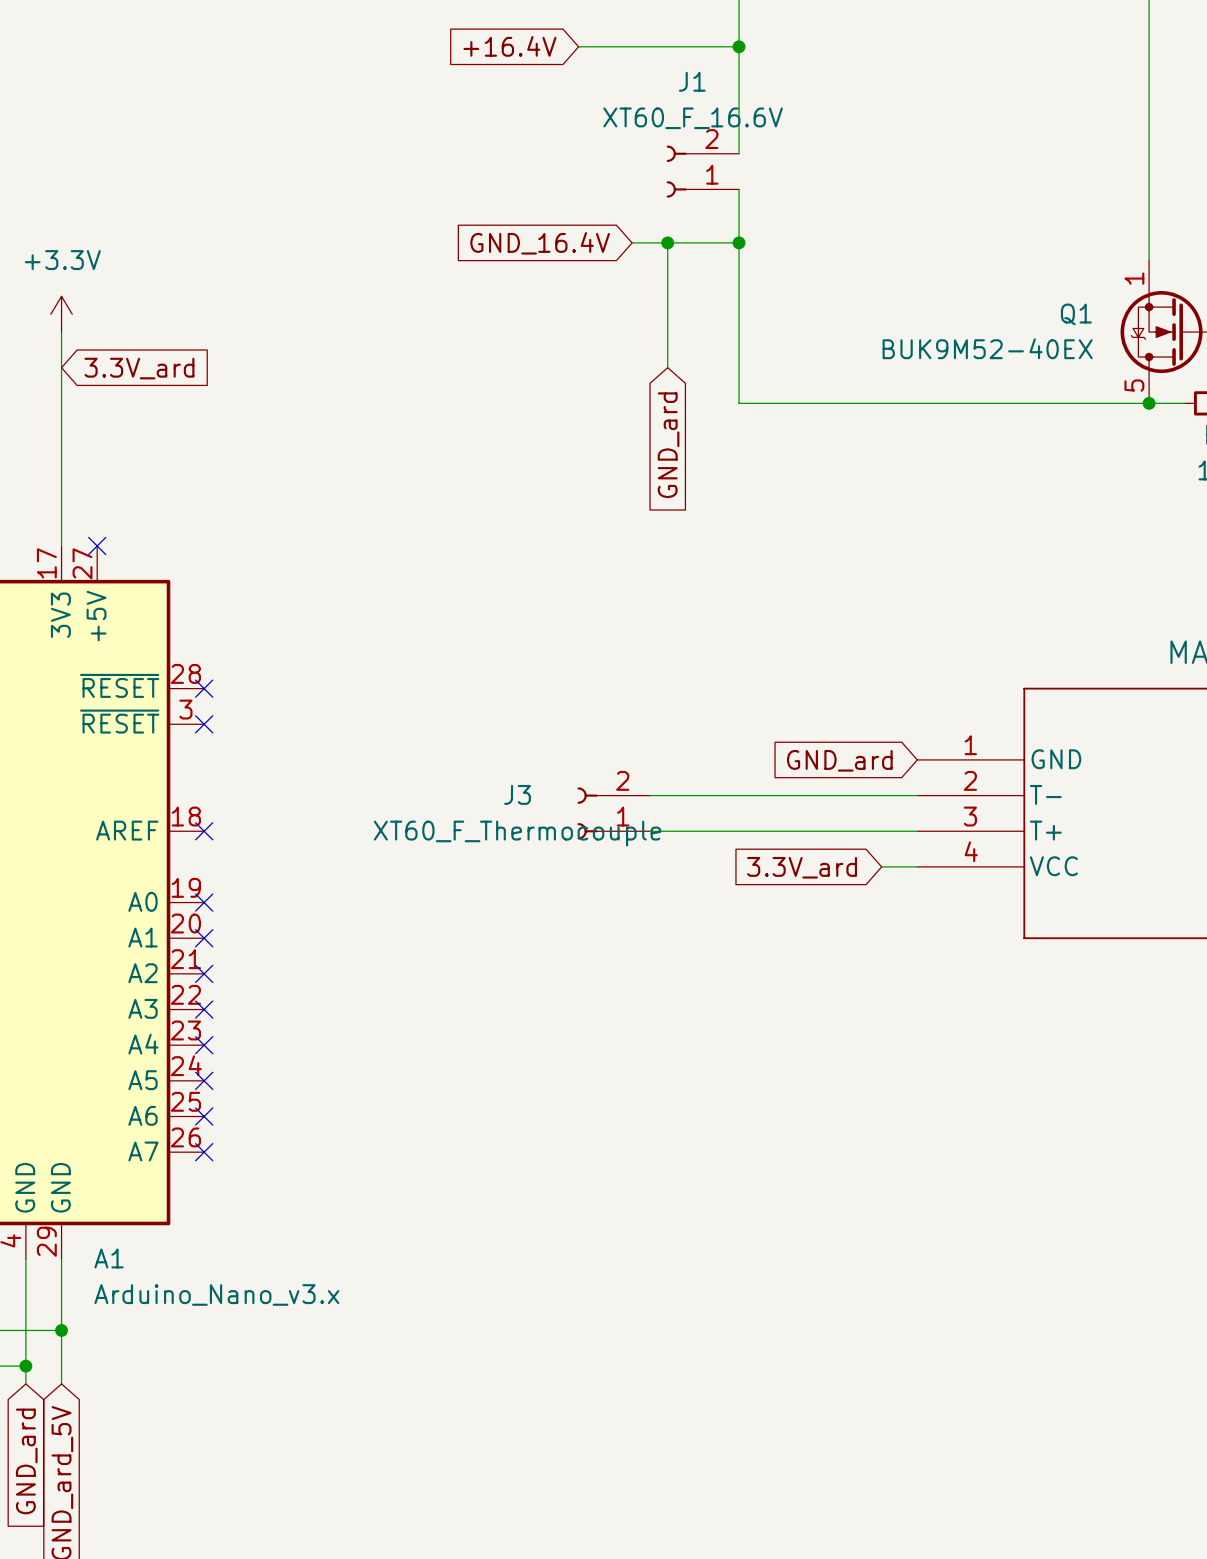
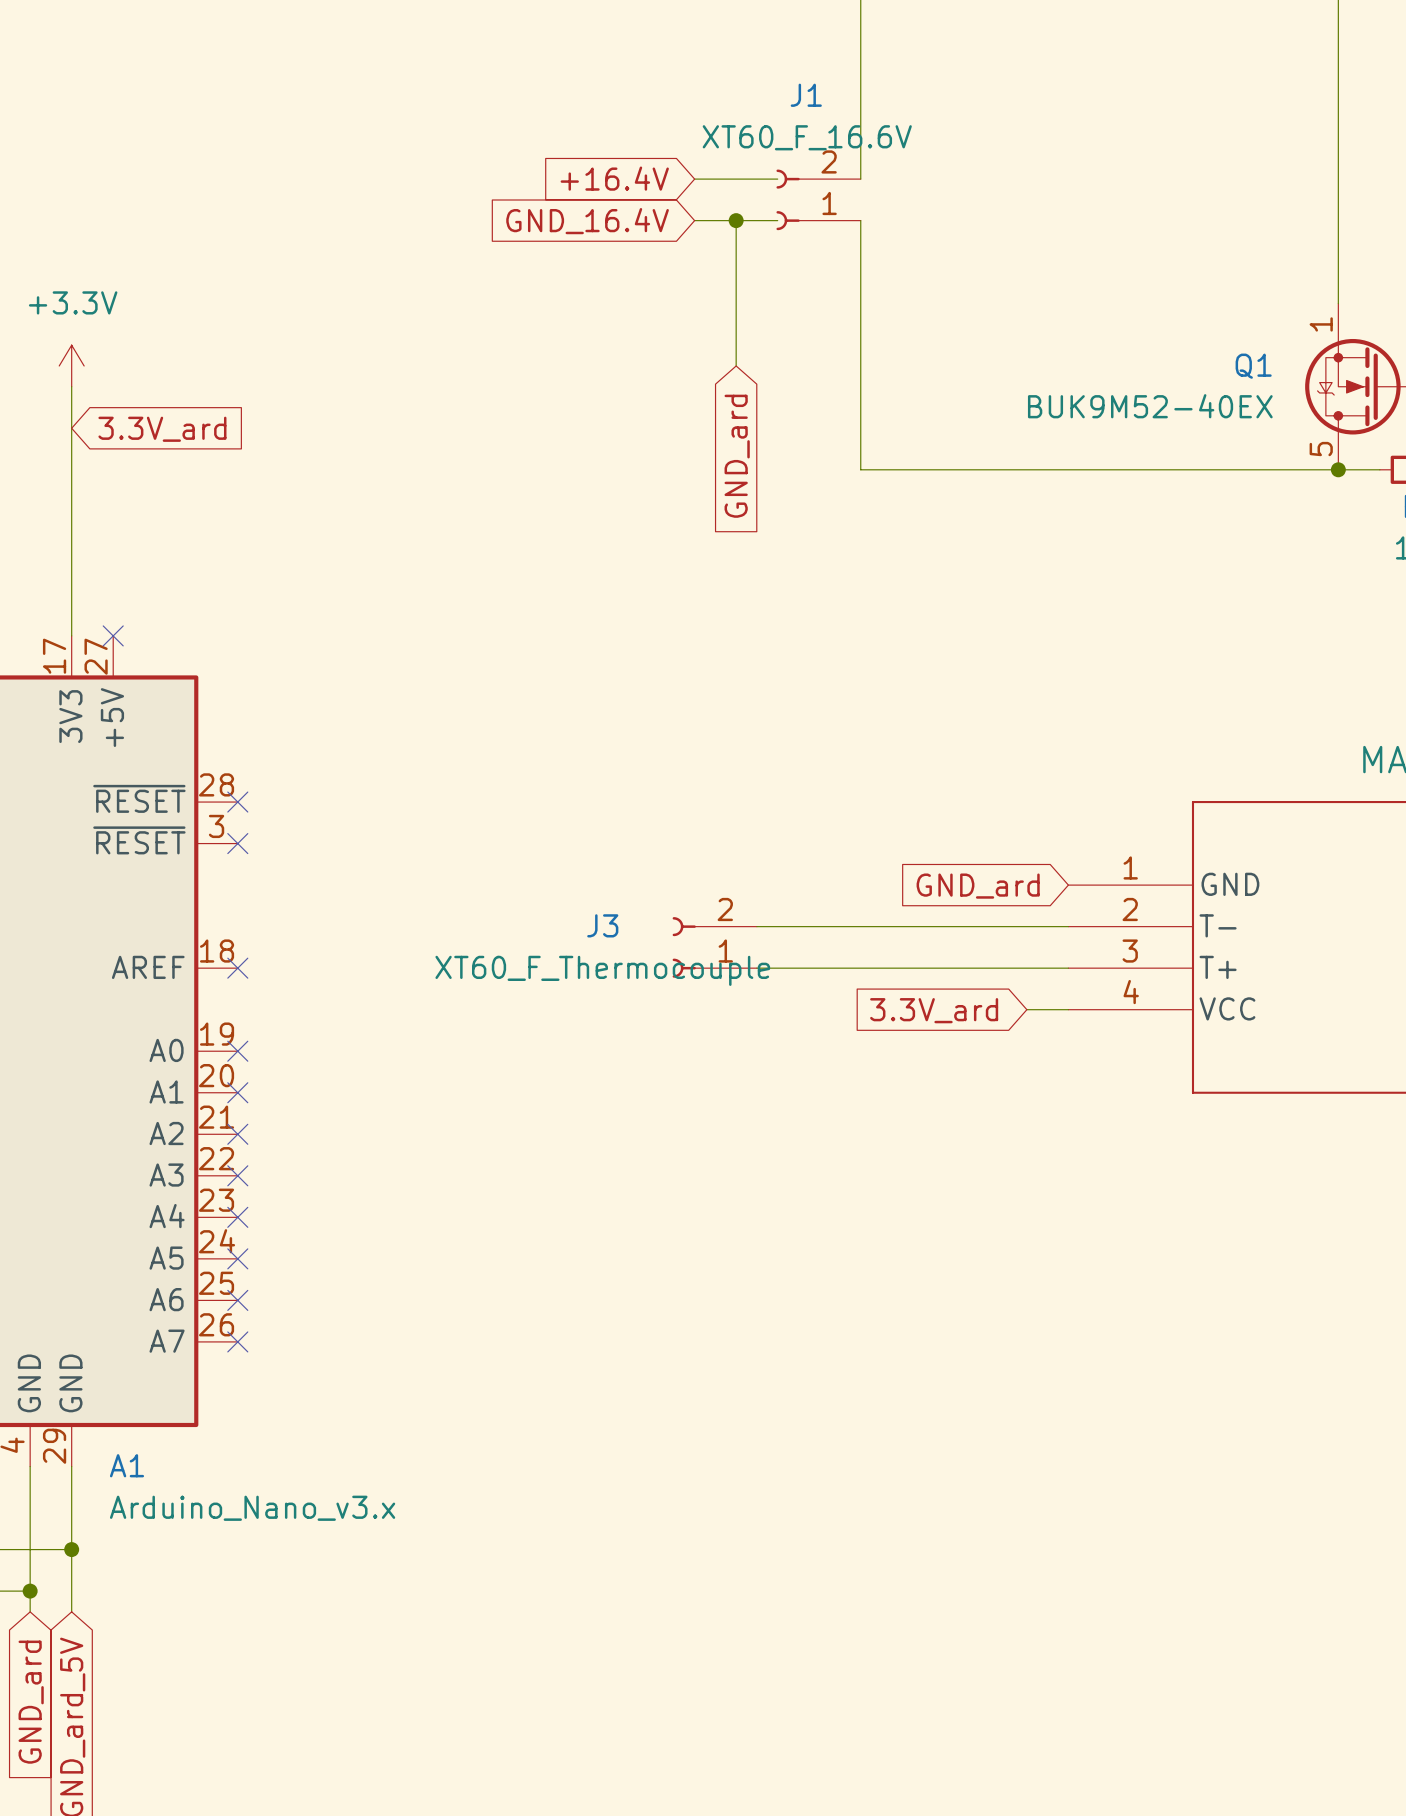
global label position: +16.4V (509, 46) -> +16.4V (614, 178)
wire: (578, 46) (739, 46) -> none
junction: (739, 46) -> none
wire: none -> (694, 179) (777, 179)
wire: none -> (694, 220) (777, 220)
junction: none -> (736, 220)
wire: (632, 242) (739, 242) -> none
wire: (667, 242) (667, 367) -> (736, 220) (736, 365)
junction: (667, 242) -> none
junction: (739, 242) -> none
global label position: GND_16.4V (540, 243) -> GND_16.4V (587, 221)
global label position: GND_ard (668, 445) -> GND_ard (737, 456)

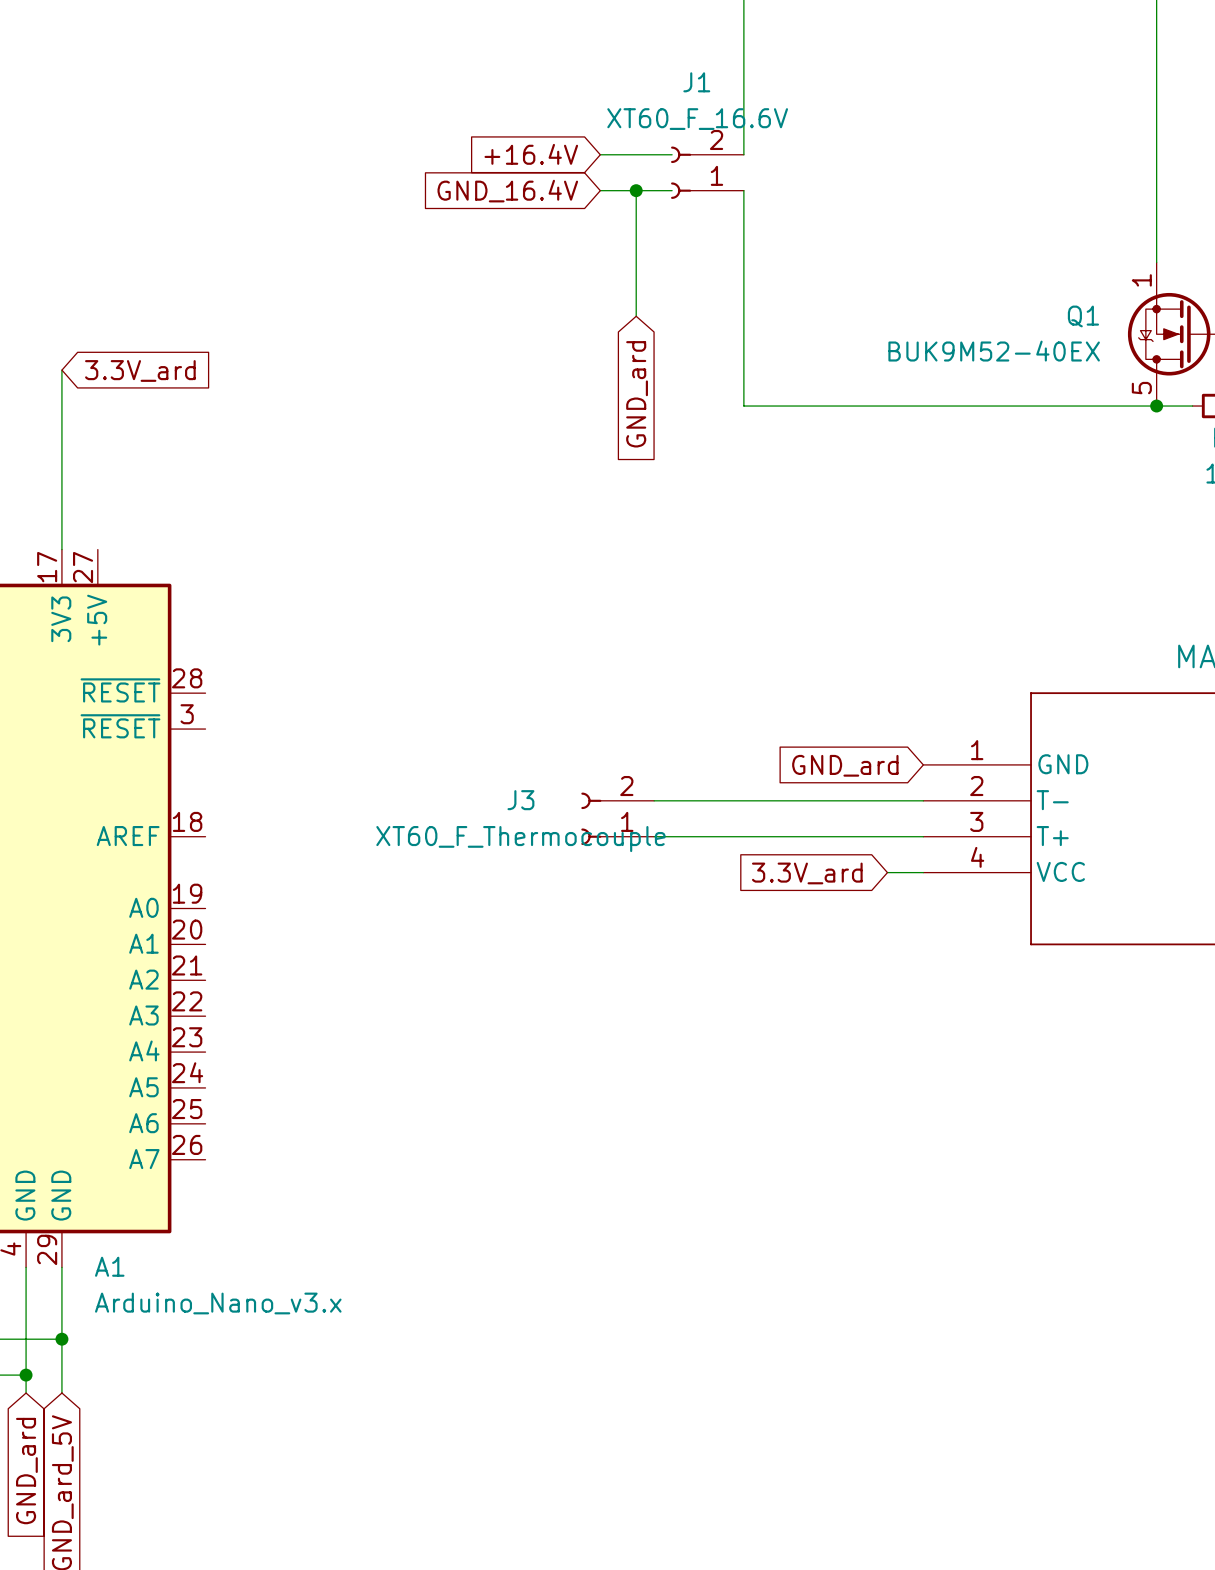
power symbol: +3.3V (71, 365) -> none
wire: (71, 386) (71, 428) -> none
no-connect mark: (113, 635) -> none
no-connect mark: (237, 802) -> none
no-connect mark: (237, 843) -> none
no-connect mark: (237, 968) -> none
no-connect mark: (237, 1051) -> none
no-connect mark: (237, 1092) -> none
no-connect mark: (237, 1134) -> none
no-connect mark: (237, 1175) -> none
no-connect mark: (237, 1217) -> none
no-connect mark: (237, 1258) -> none
no-connect mark: (237, 1300) -> none
no-connect mark: (237, 1341) -> none

